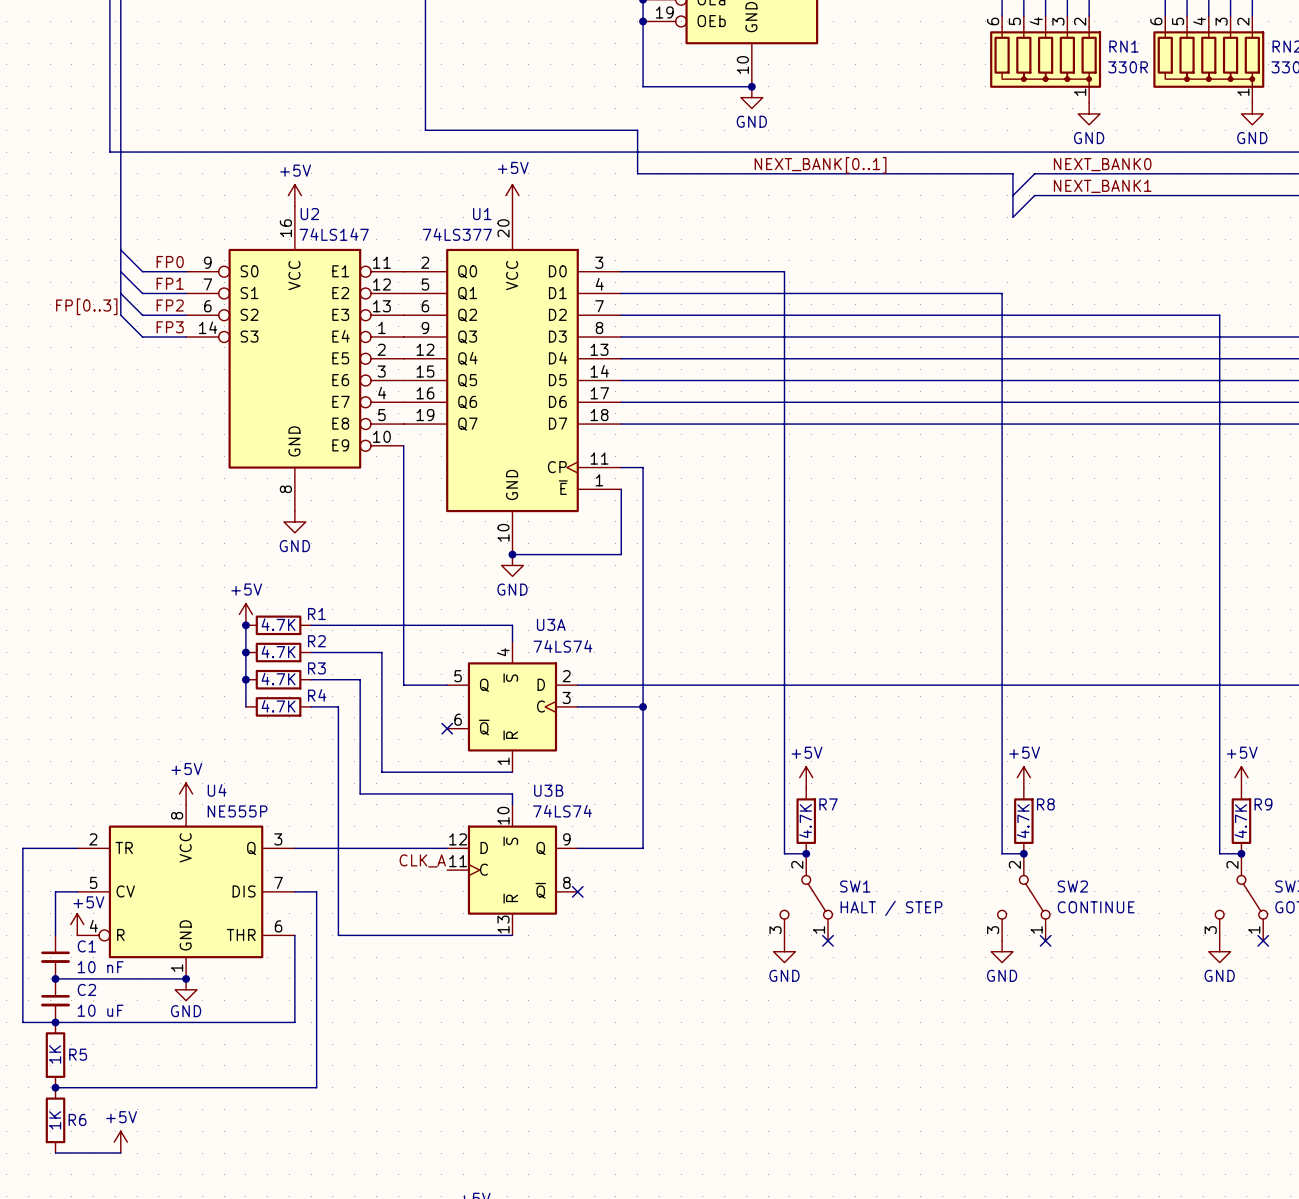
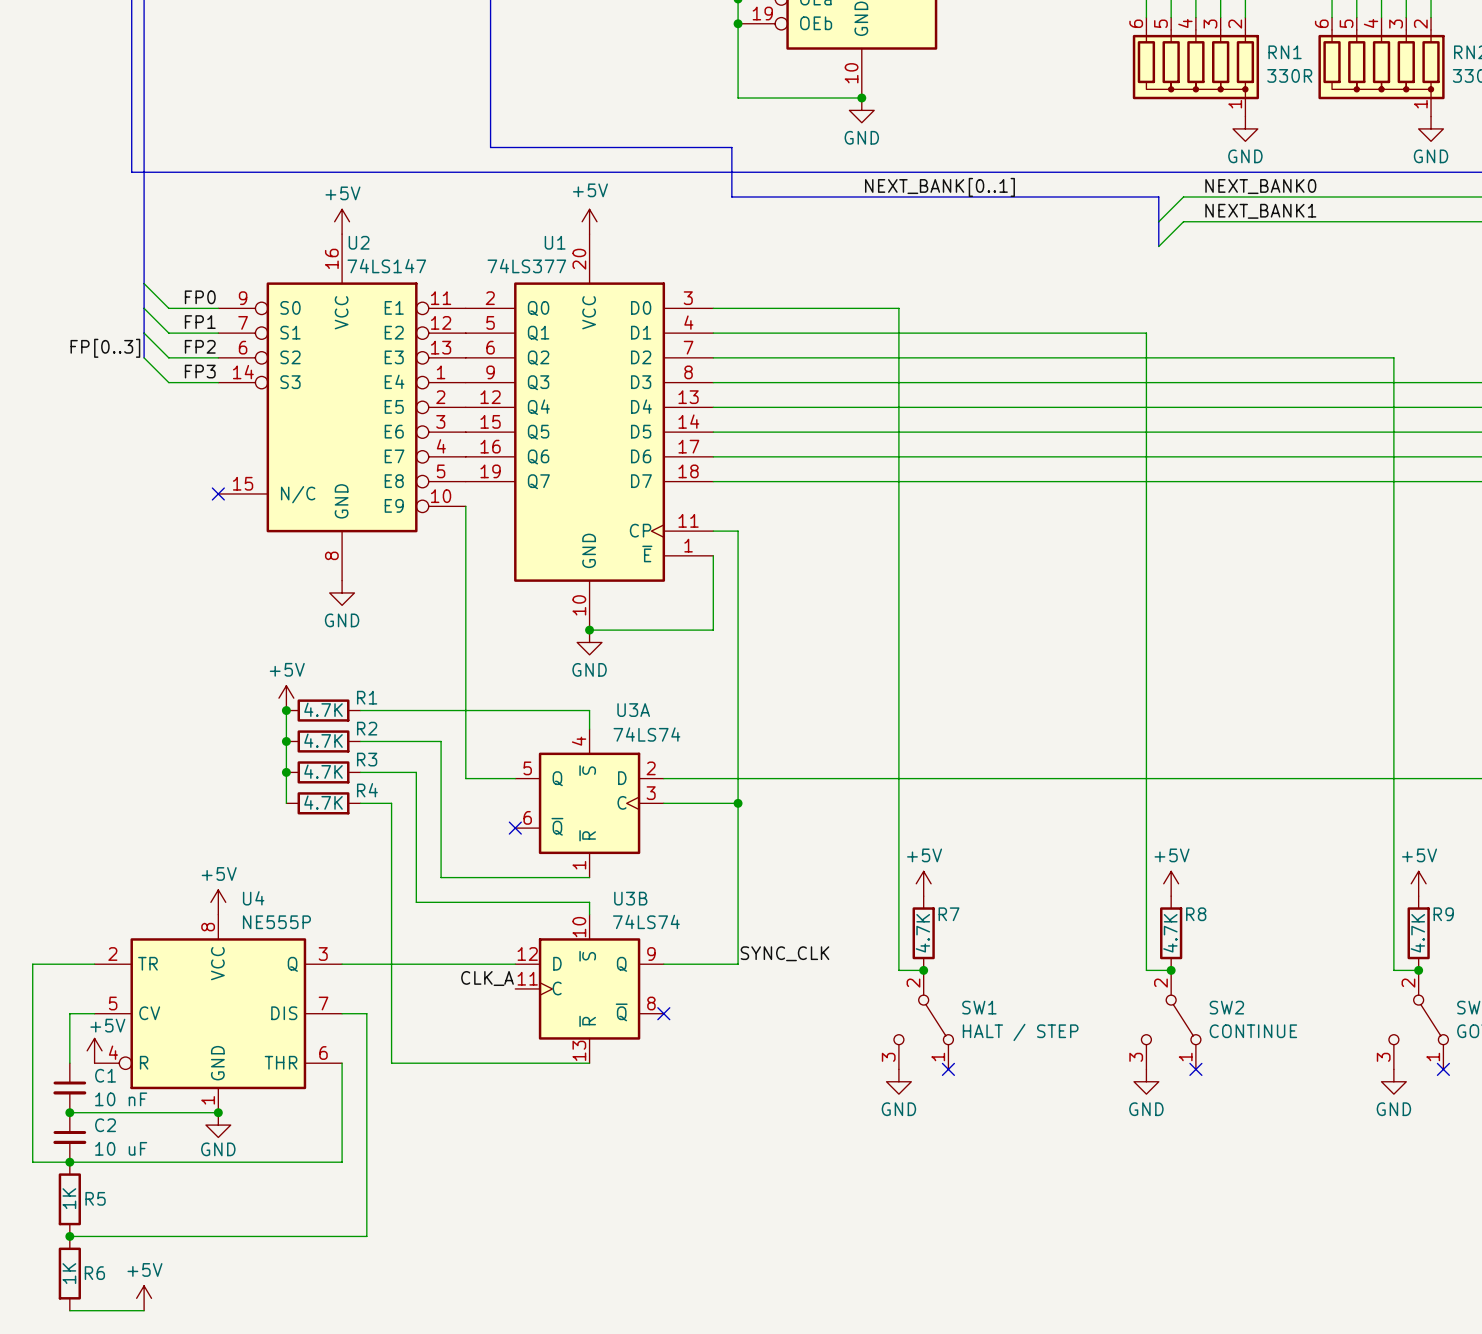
U2 symbol: [186, 206, 404, 512] -> [218, 234, 466, 581]
no-connect mark: none -> (218, 493)
label: none -> SYNC_CLK (784, 953)

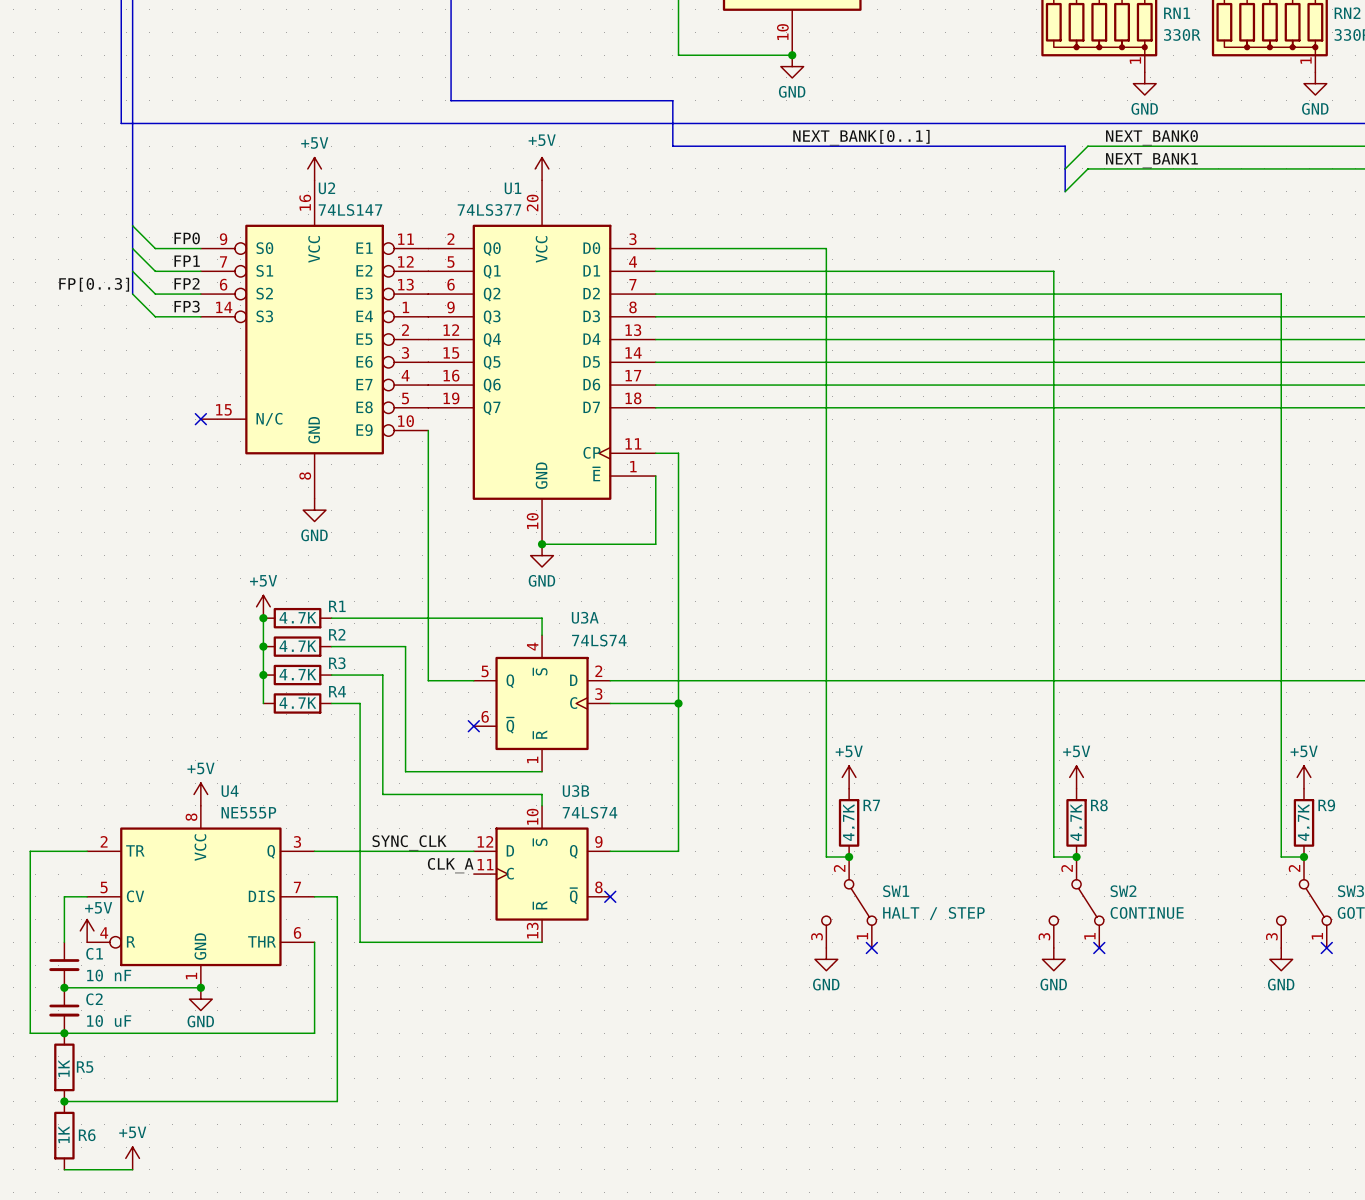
label: none -> SYNC_CLK (409, 842)
label: SYNC_CLK (784, 953) -> none

